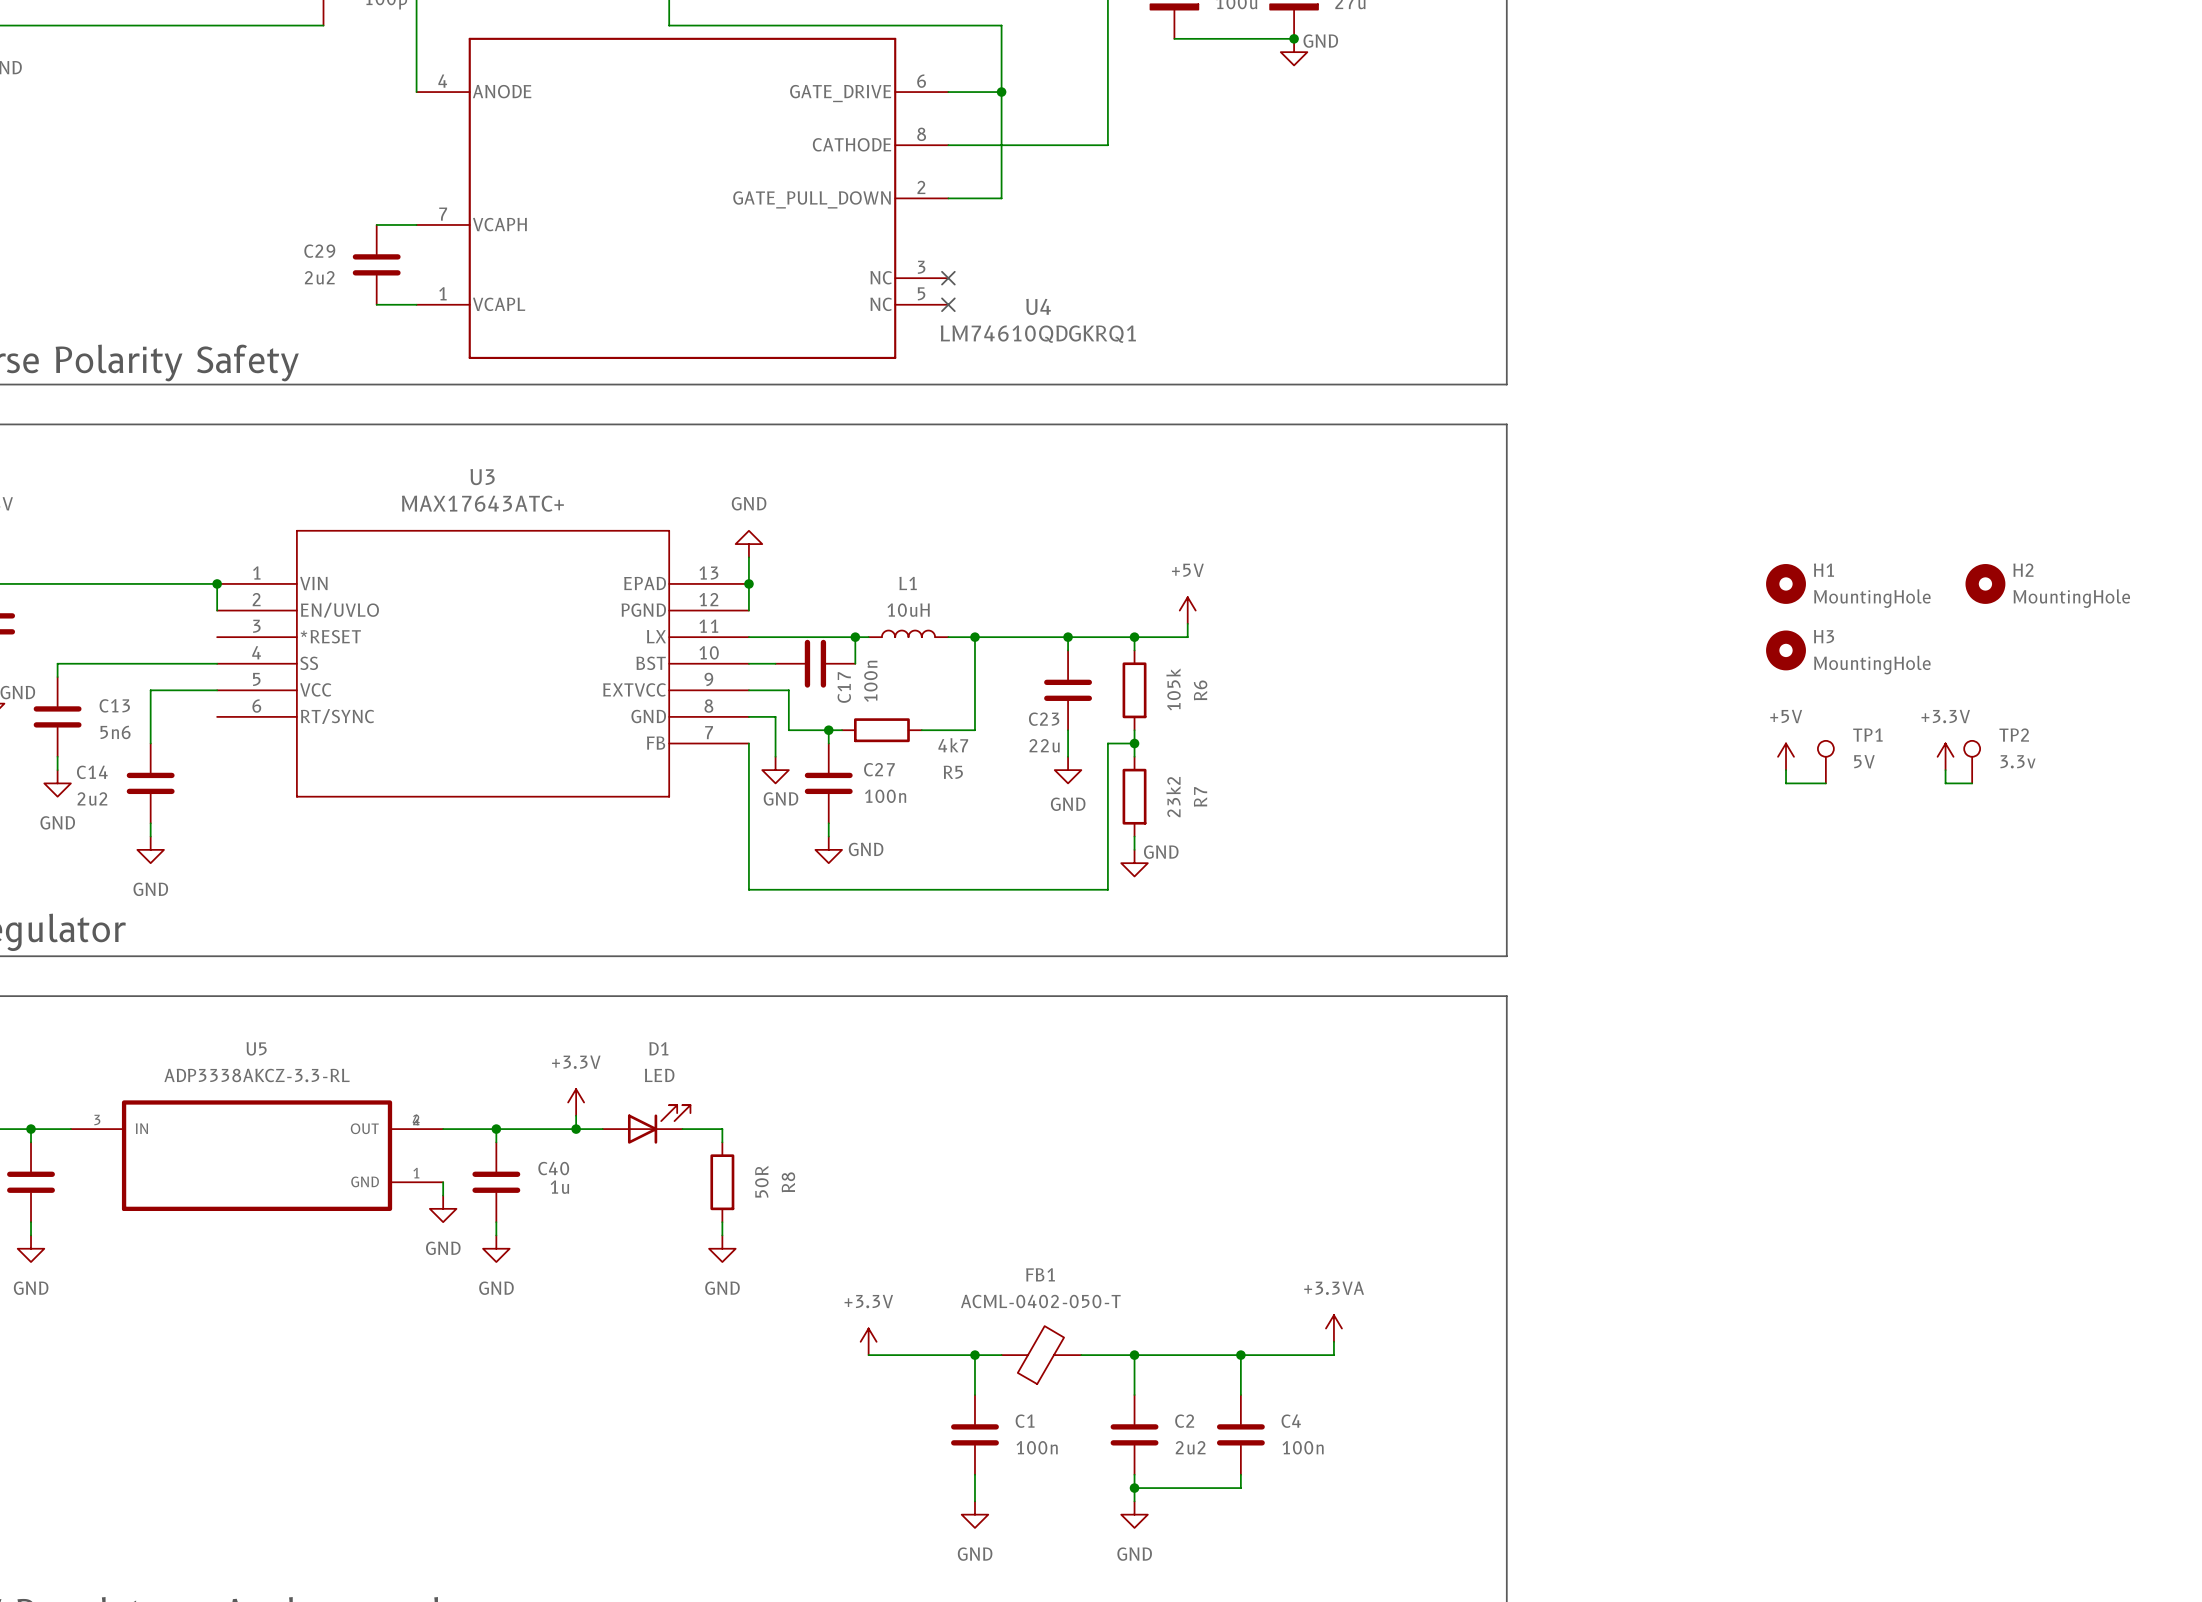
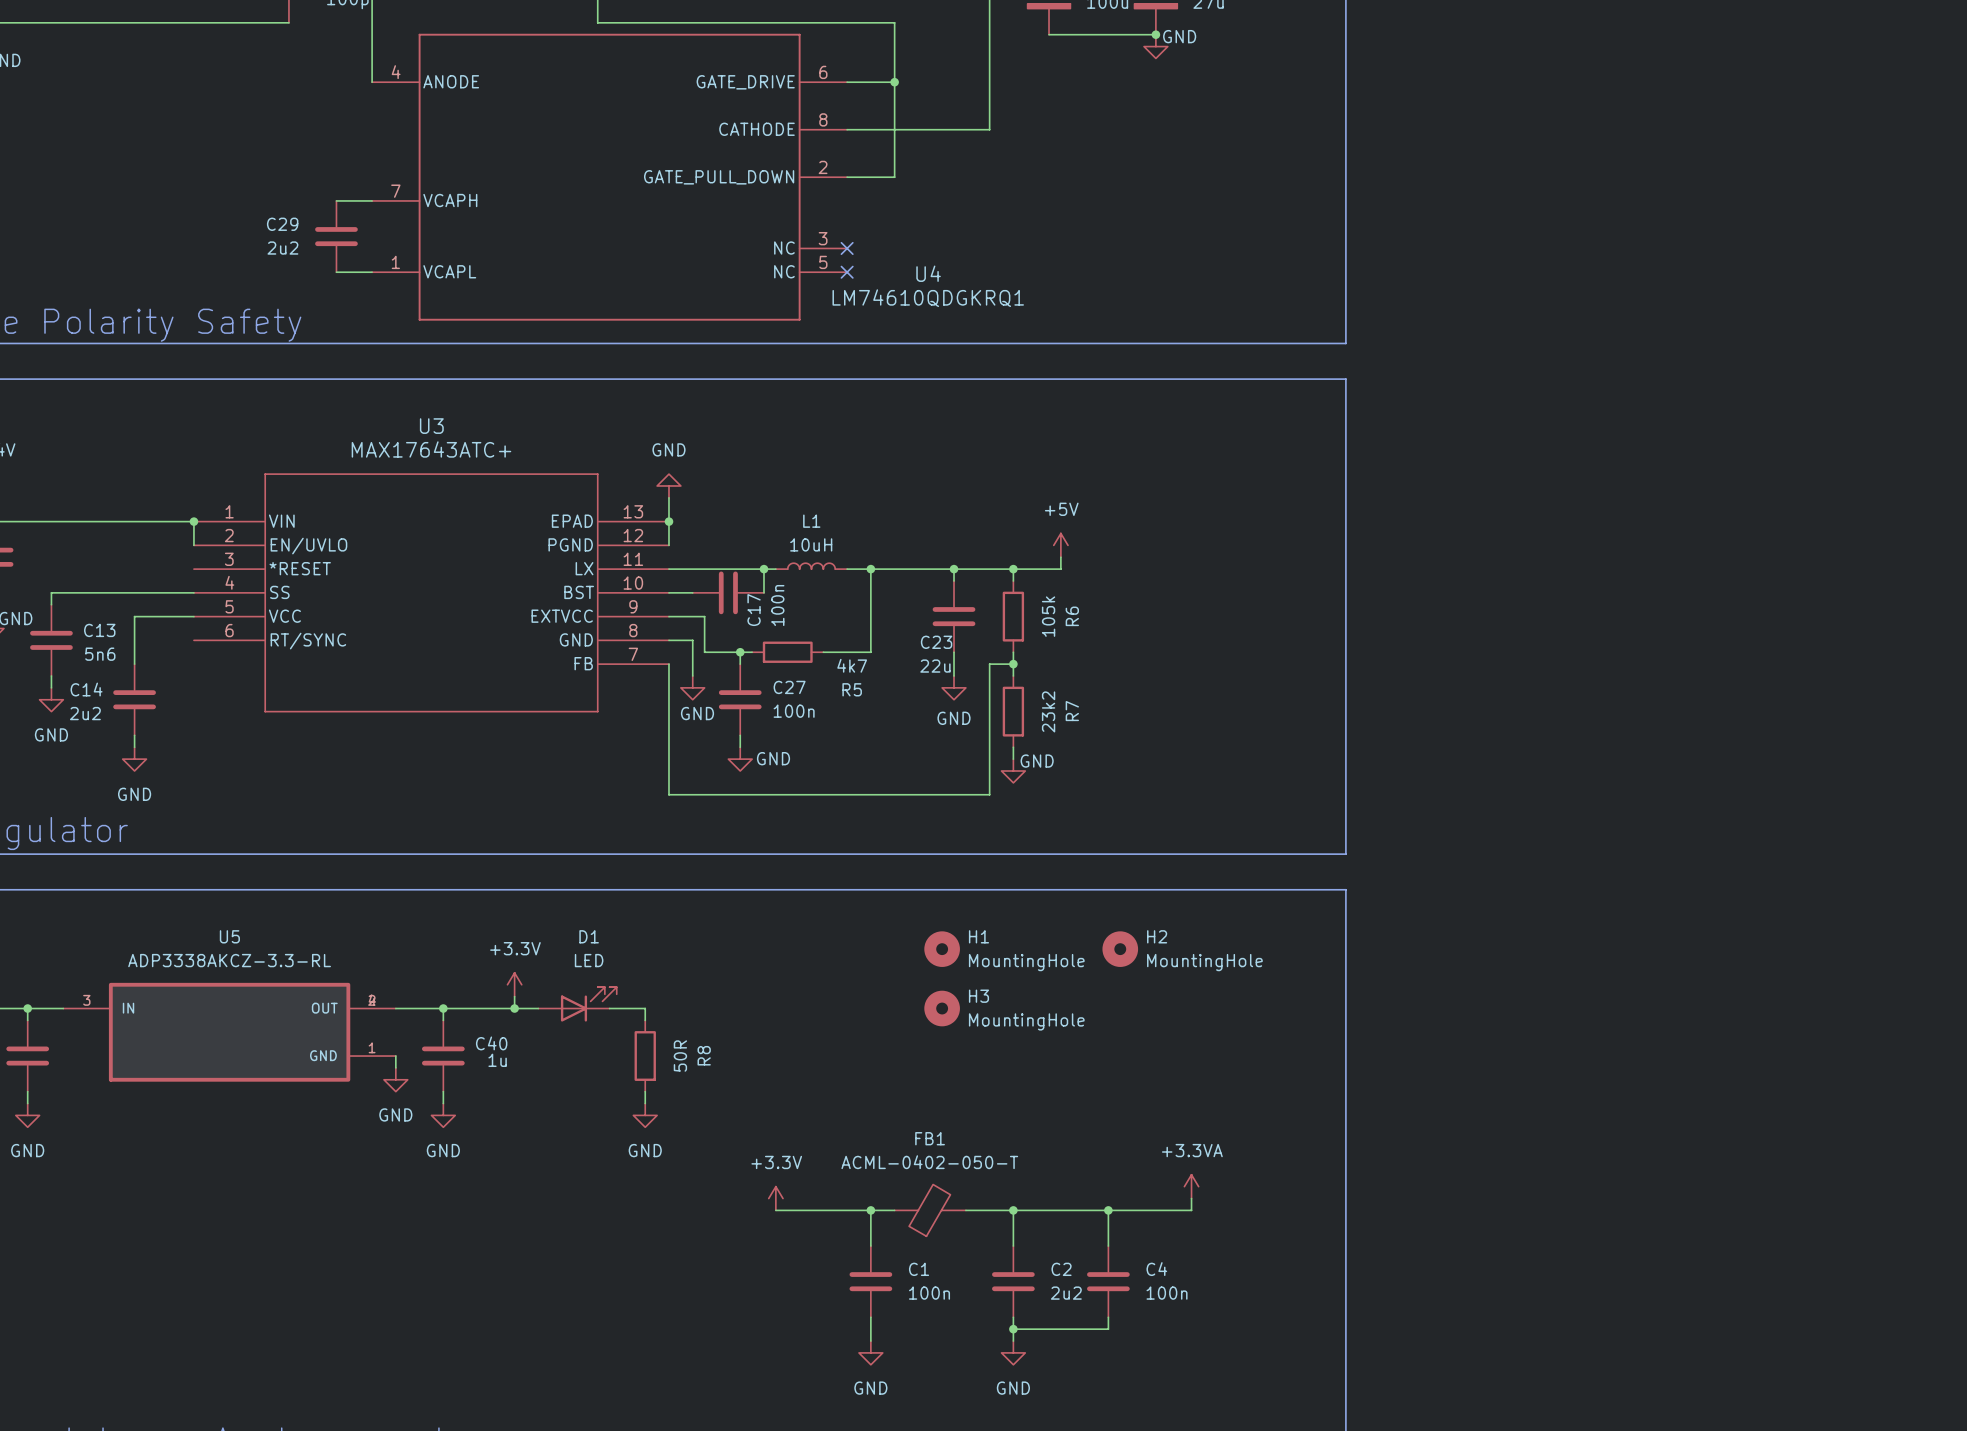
H1 position: (1786, 583) -> (942, 949)
H2 position: (1985, 583) -> (1120, 949)
H3 position: (1786, 650) -> (942, 1008)
power symbol: +5V (1786, 756) -> none
power symbol: +3.3V (1945, 756) -> none
TP1: 5V (1825, 762) -> none
TP2: 3.3v (1972, 762) -> none
wire: (1786, 770) (1786, 783) (1825, 783) -> none
wire: (1945, 770) (1945, 783) (1972, 783) -> none

